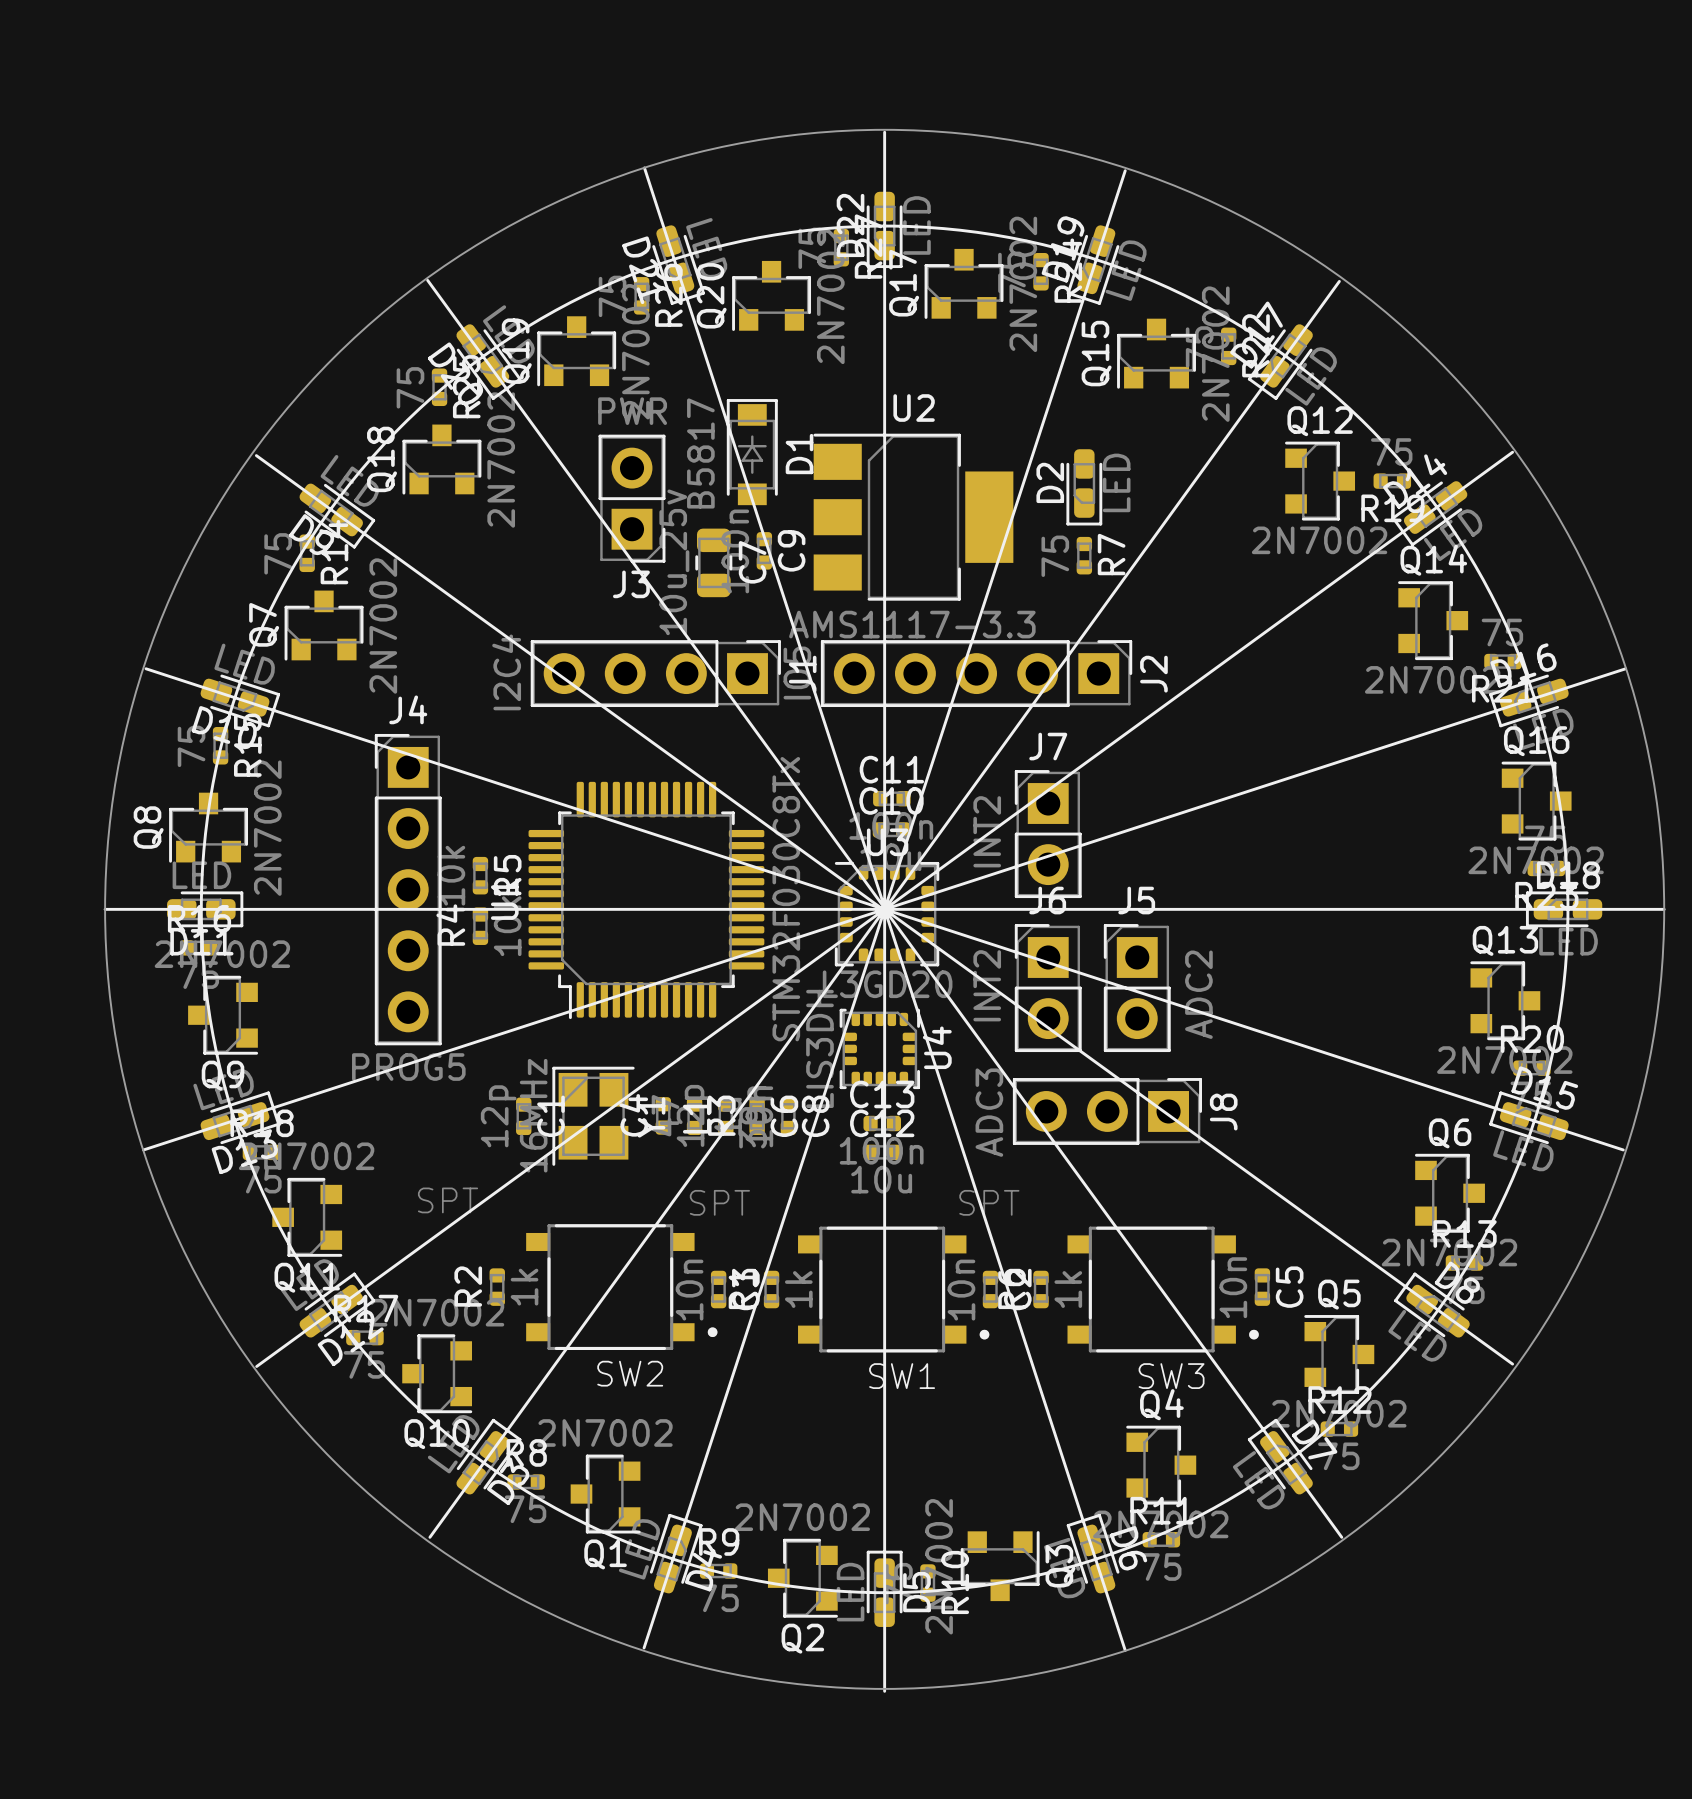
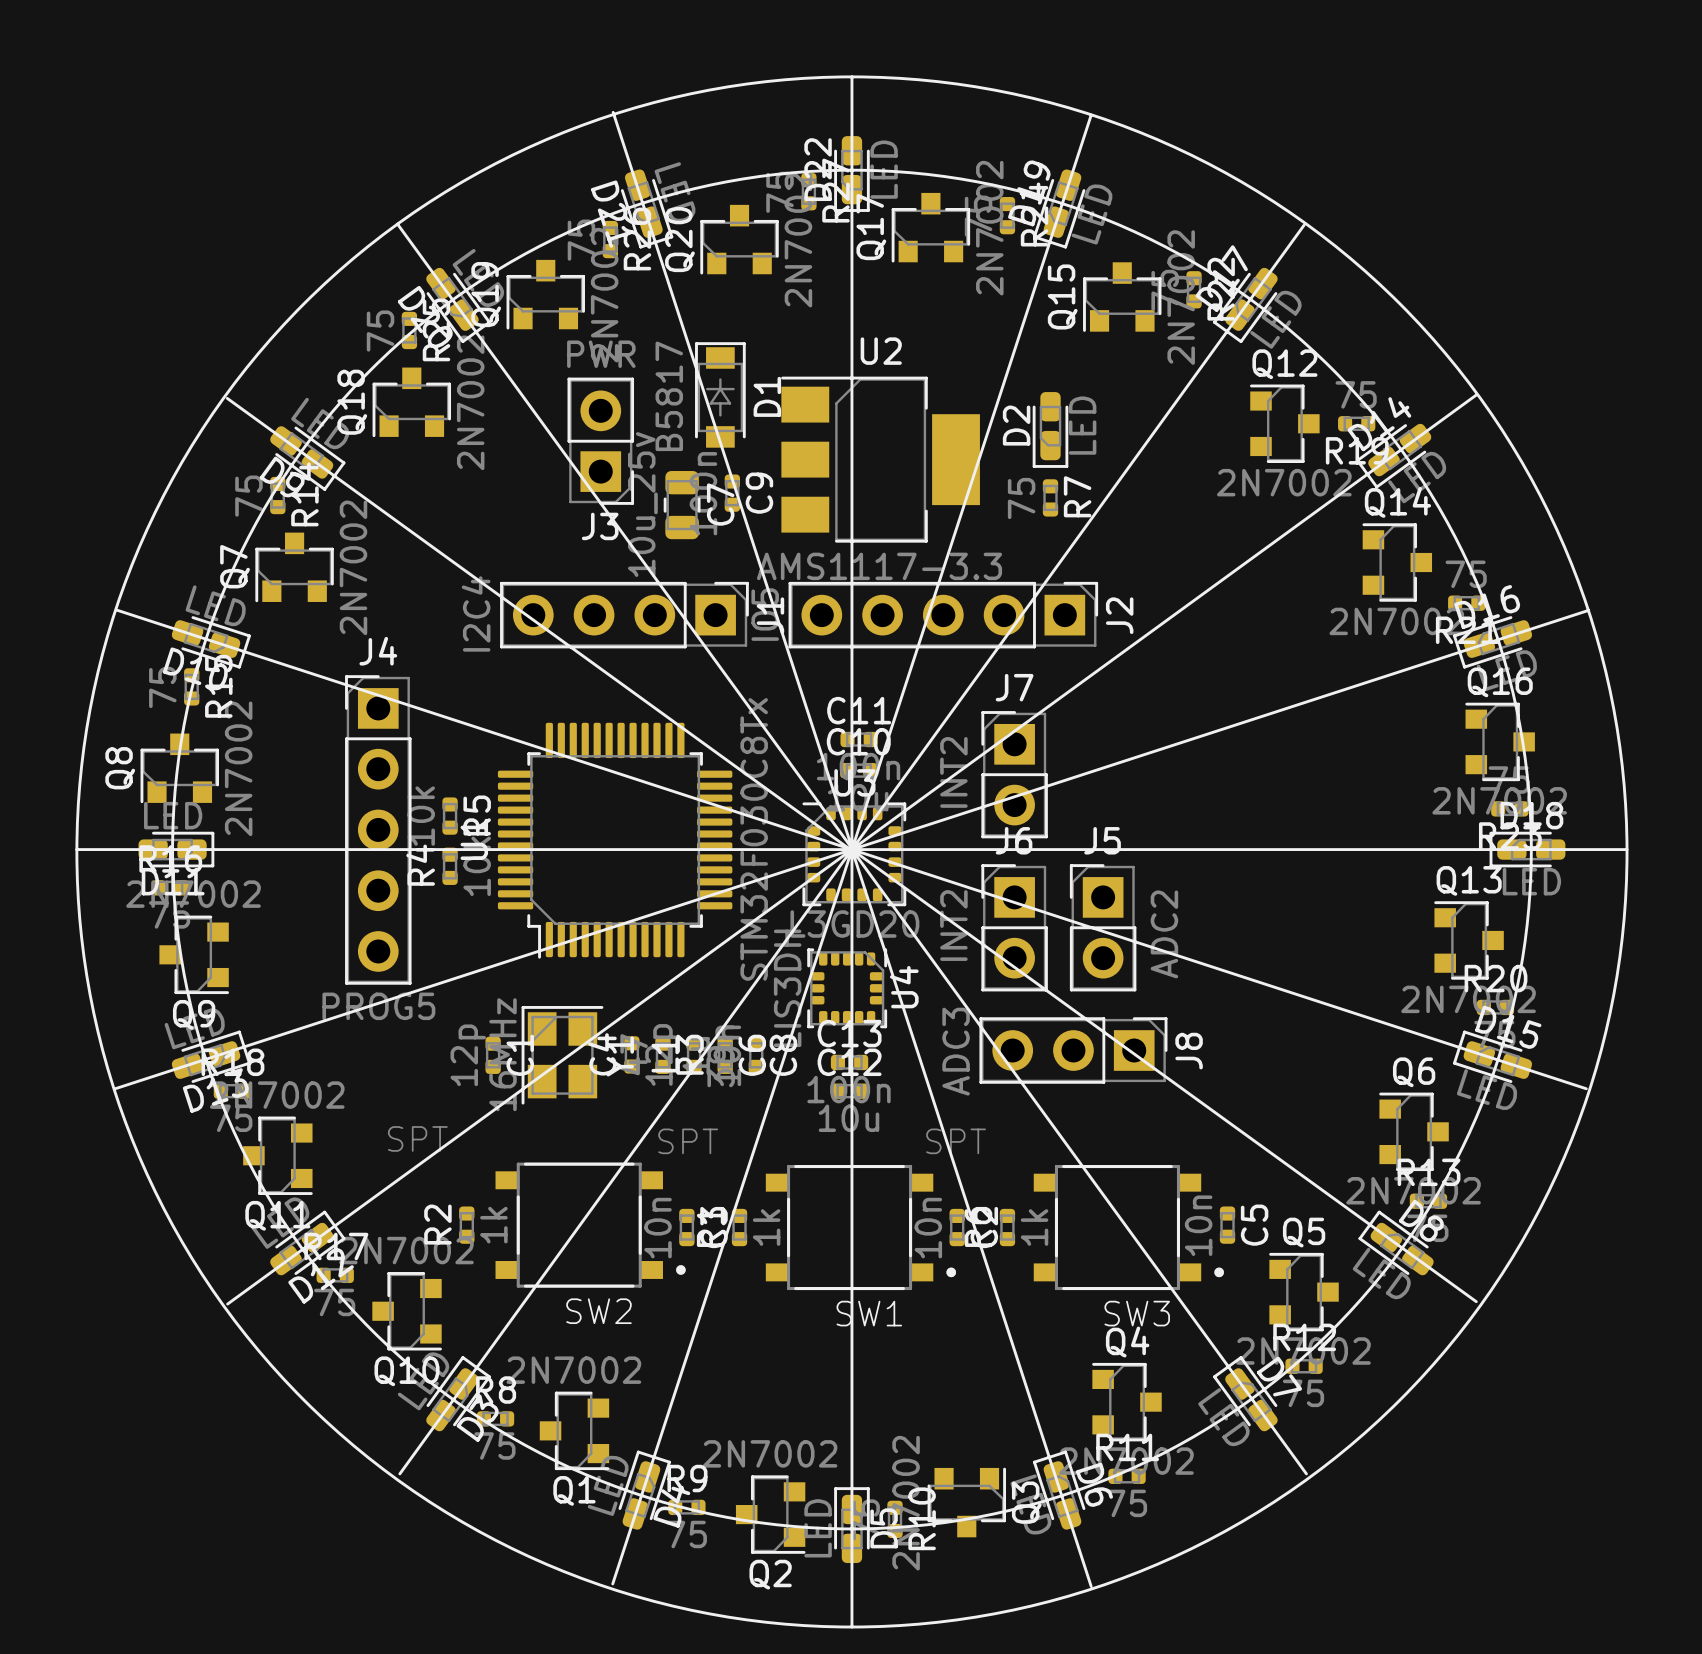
round board edge: [104, 129, 1665, 1690] -> none
drawing: none -> [75, 75, 1629, 1629]

